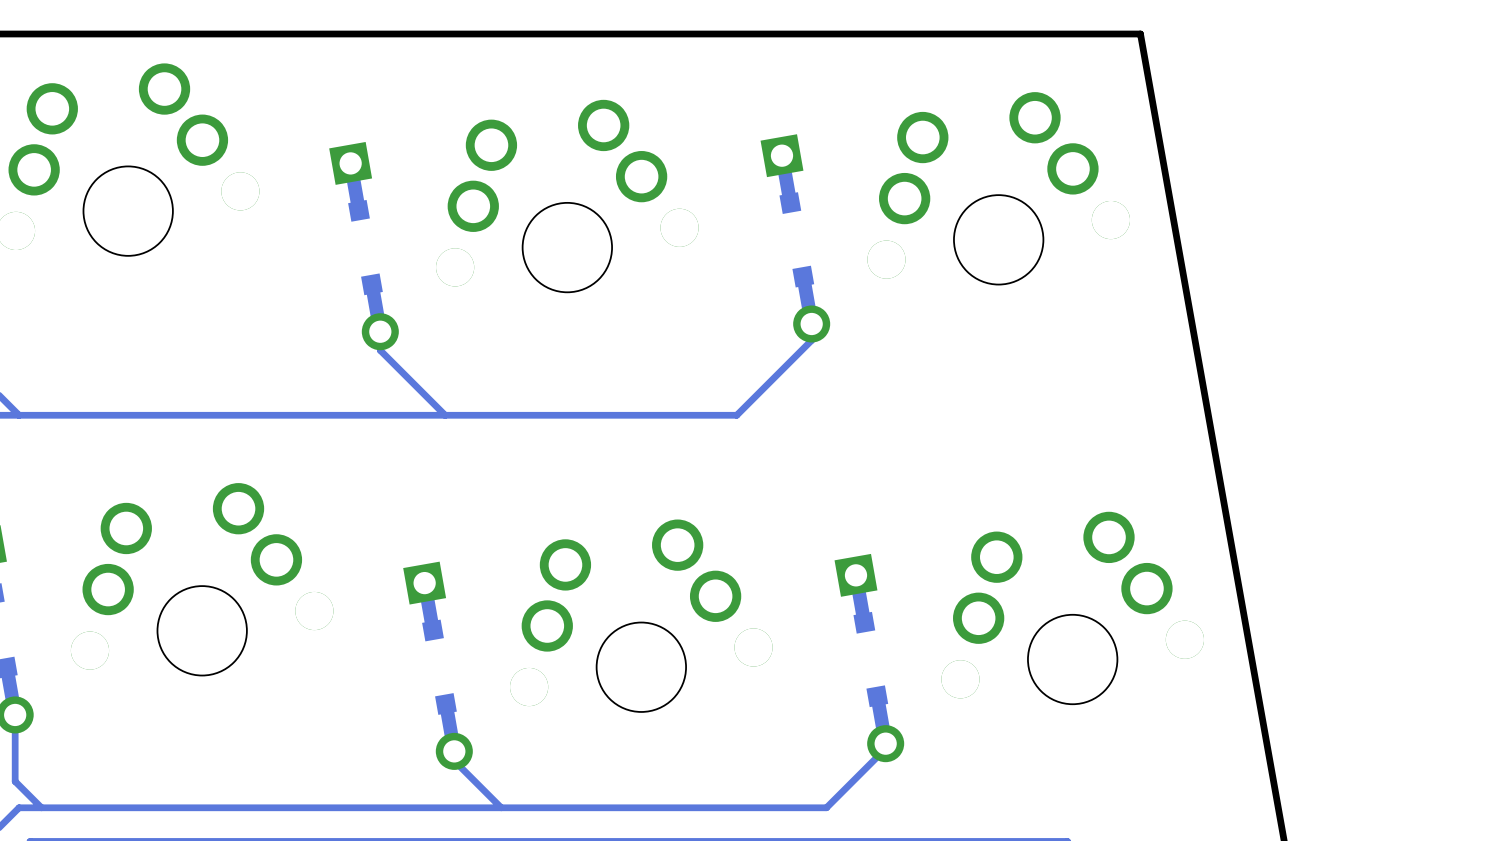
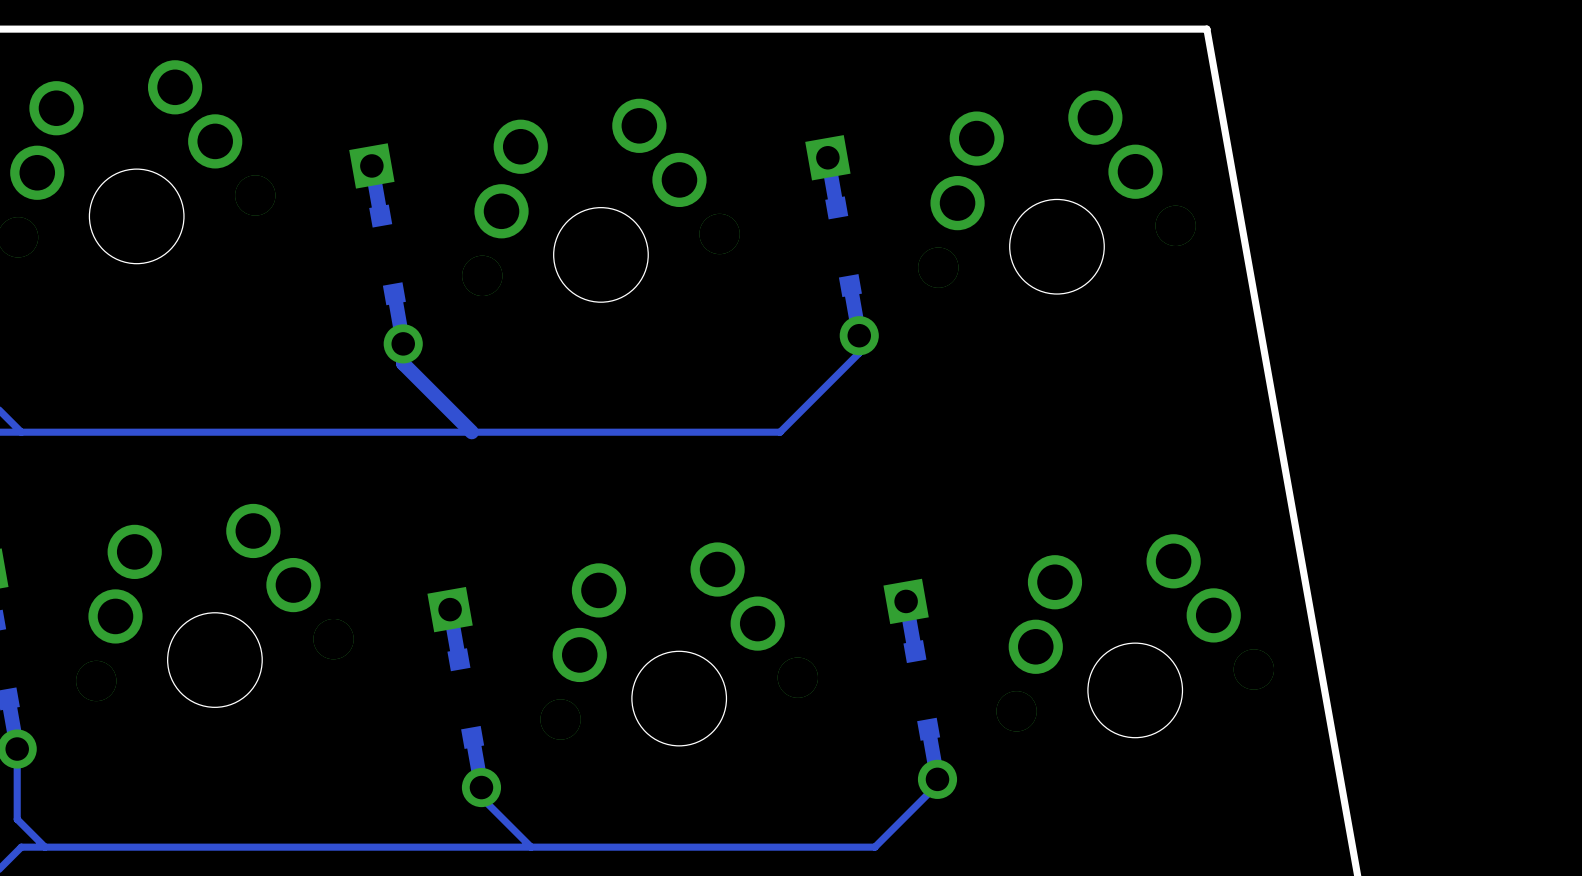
track width: thin (380, 331) (380, 350) (445, 415) -> thick (403, 343) (403, 363) (471, 432)

